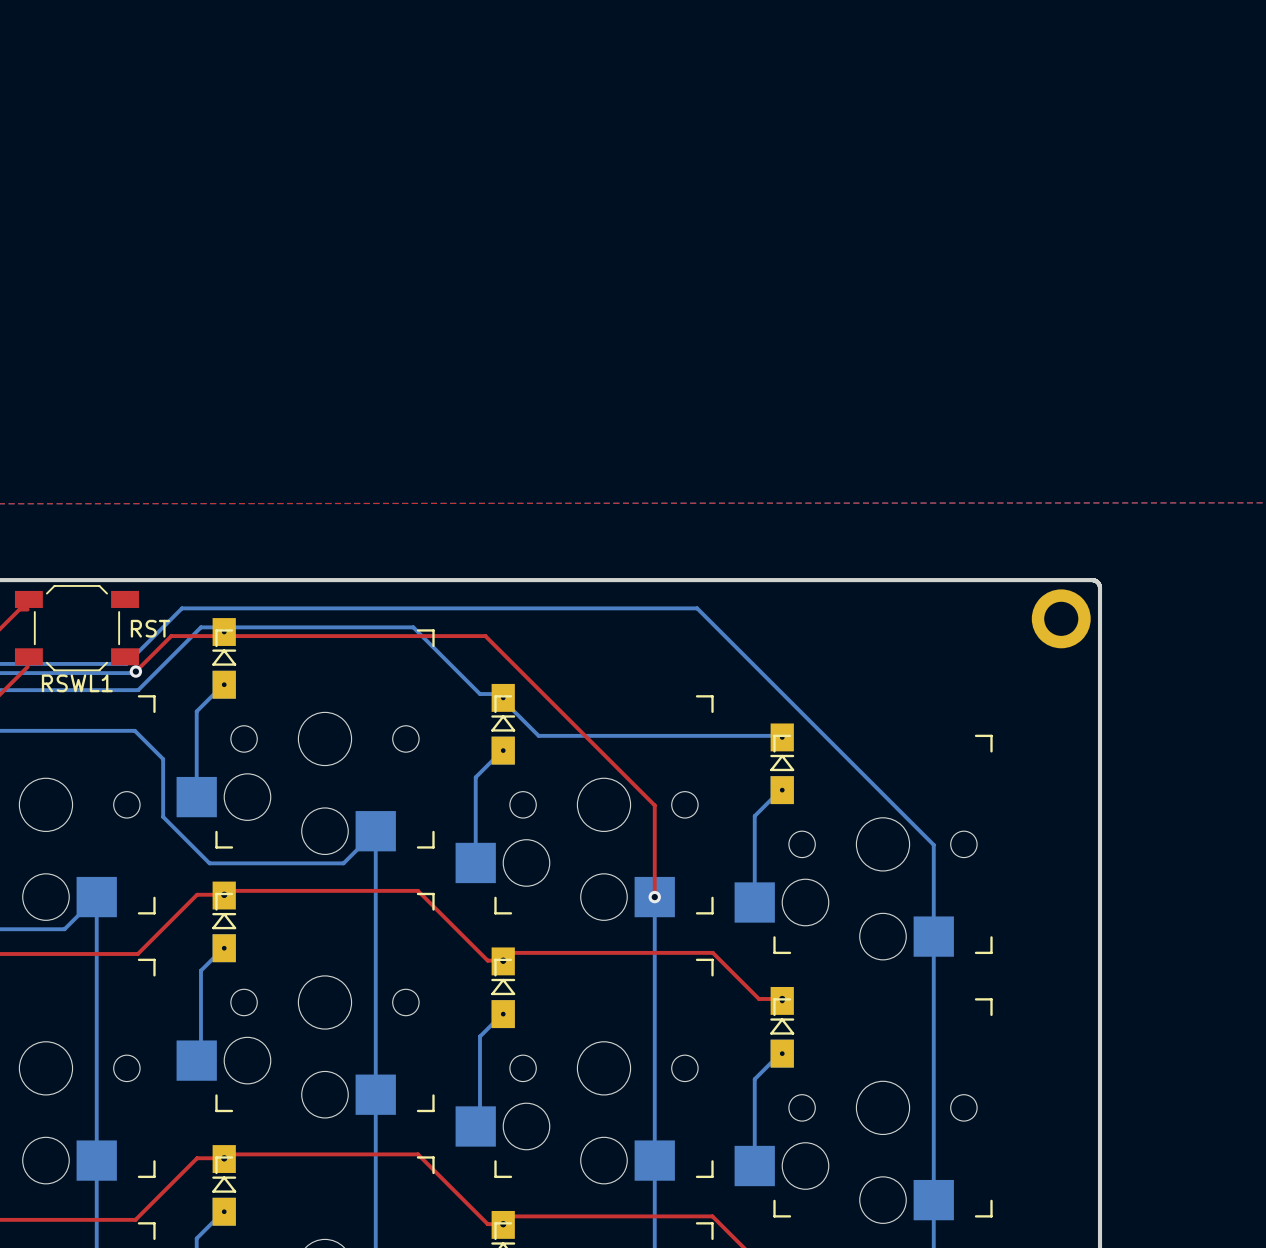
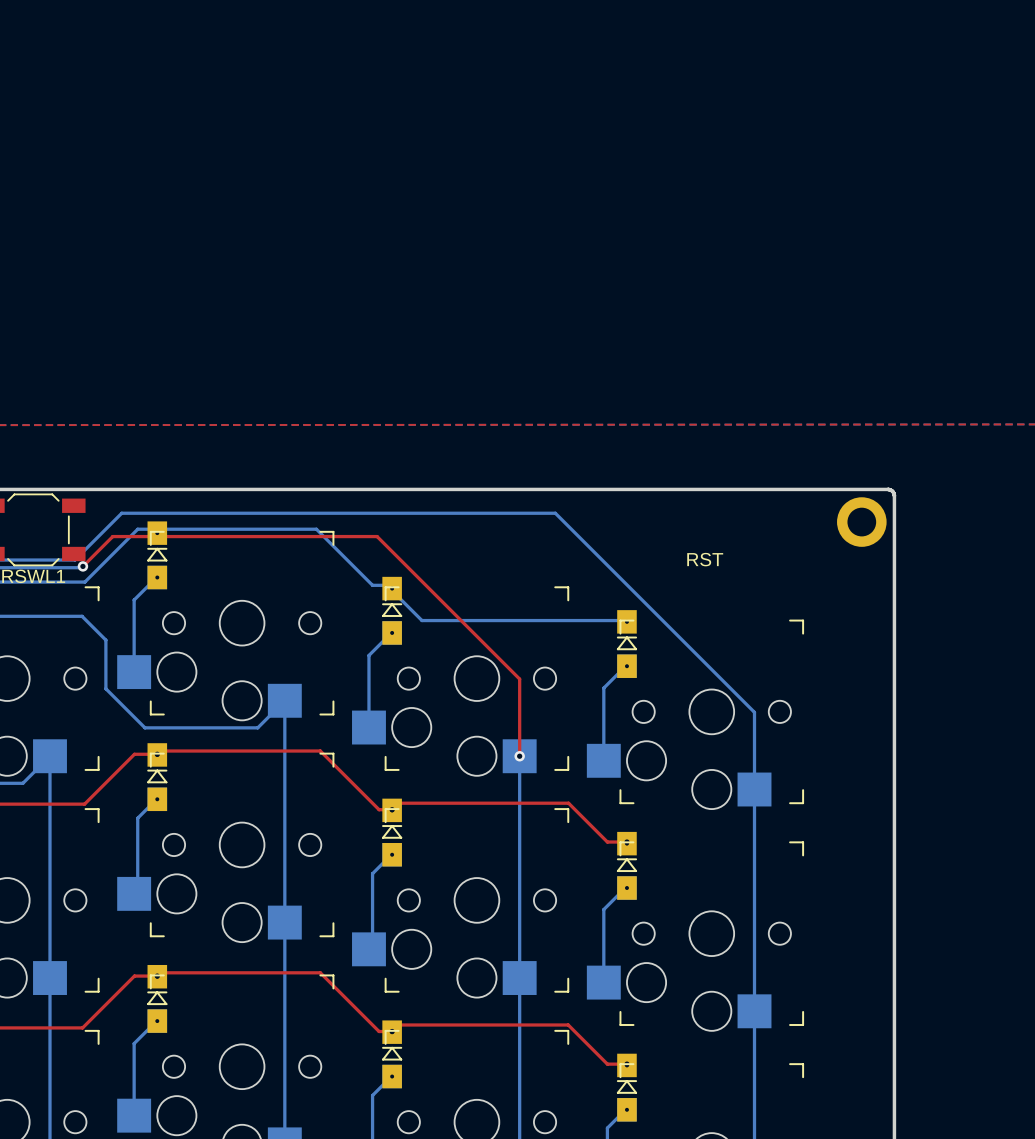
text: RST (150, 628) -> none
text: none -> RST (705, 559)

